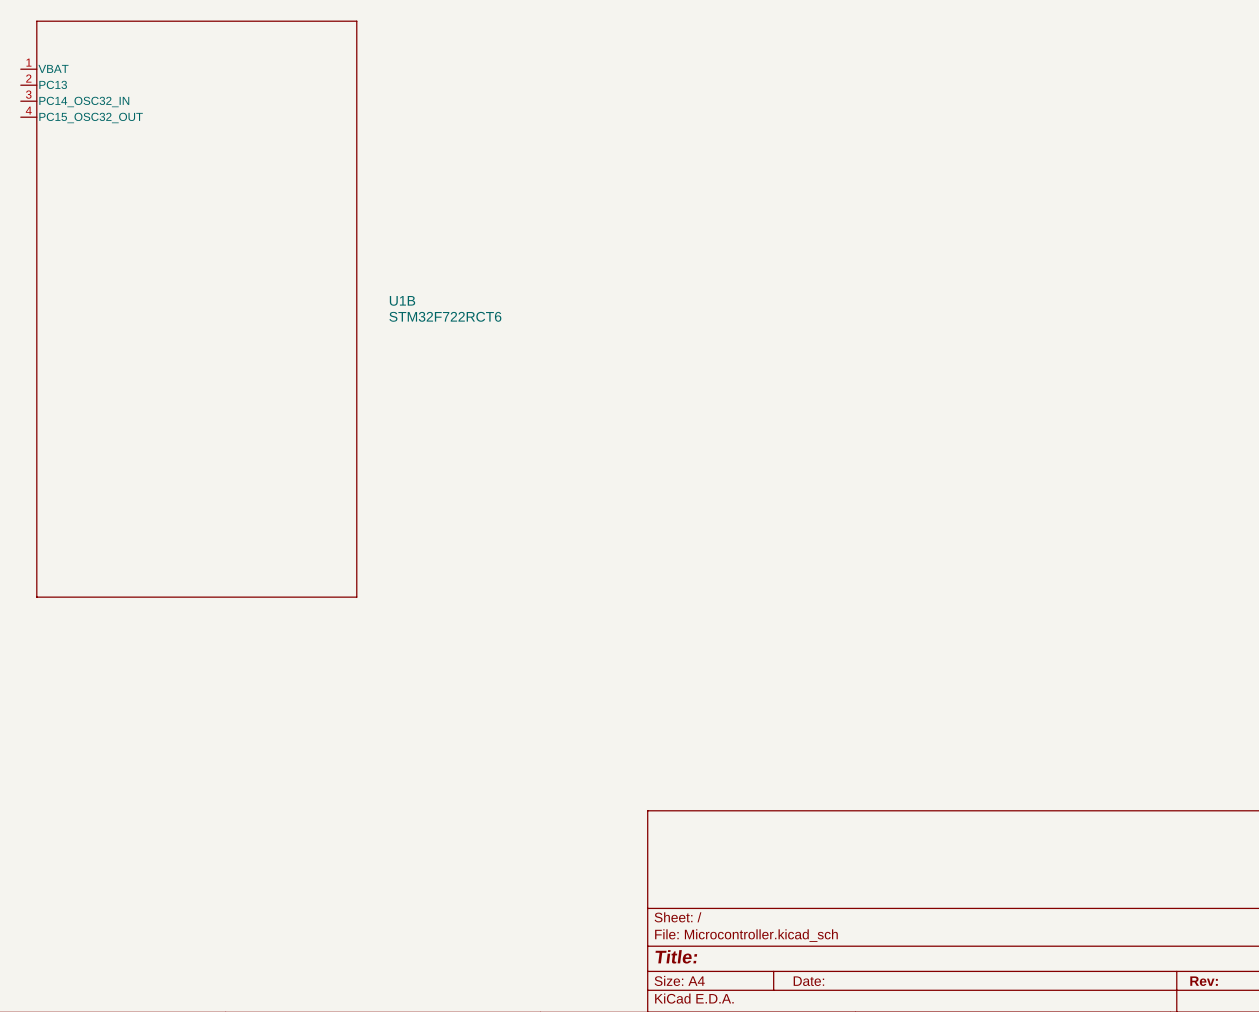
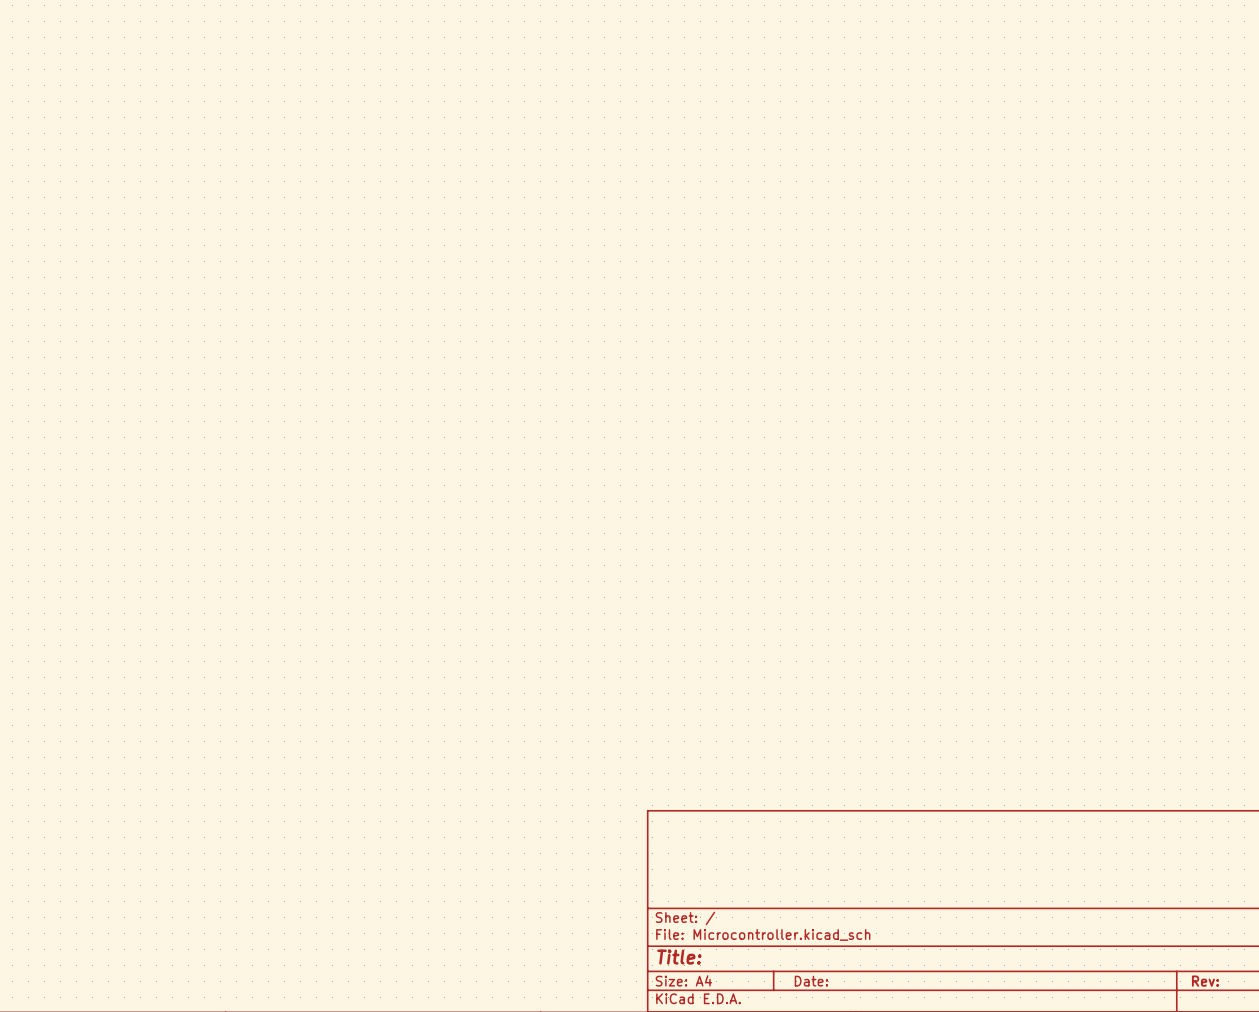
U1B: STM32F722RCT6 (188, 309) -> none

